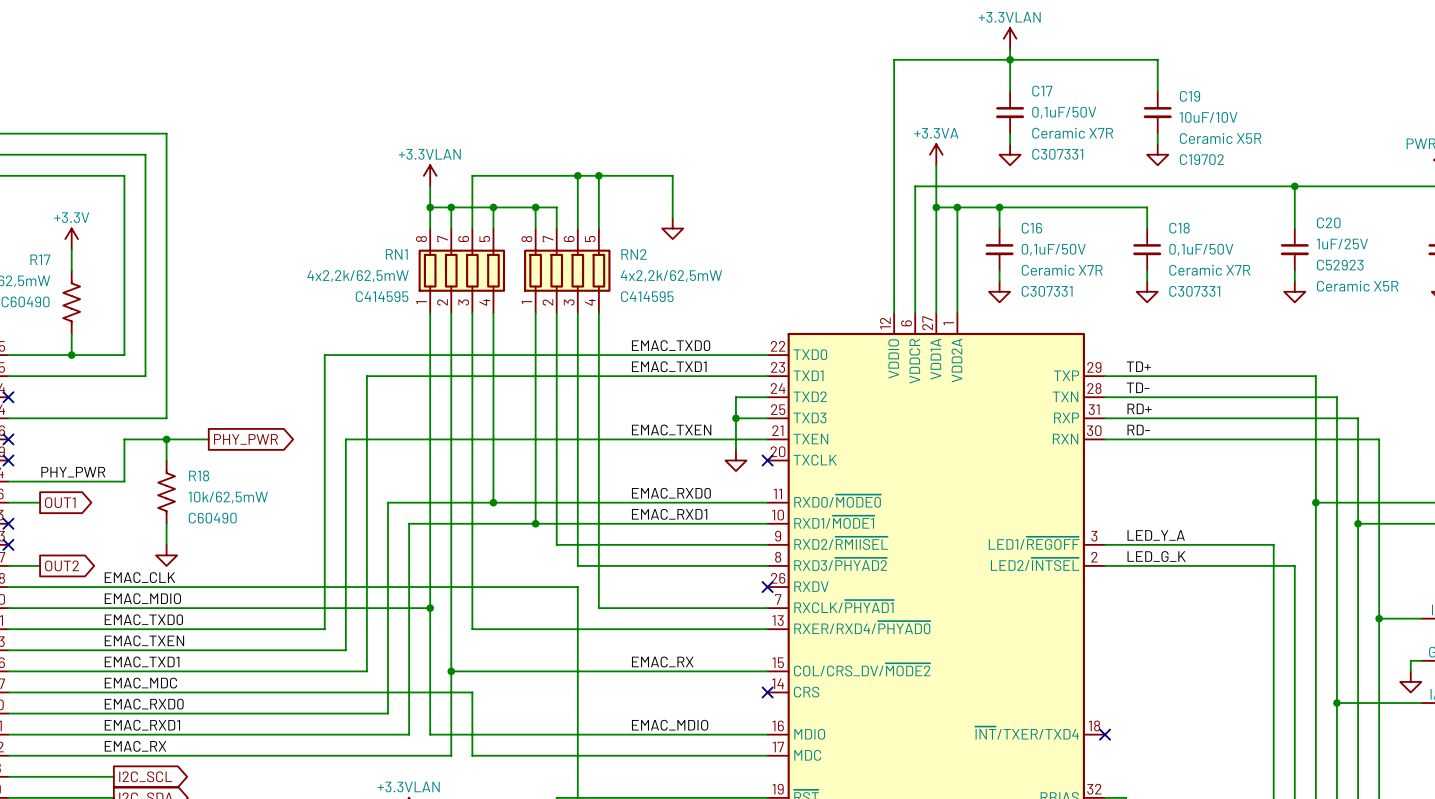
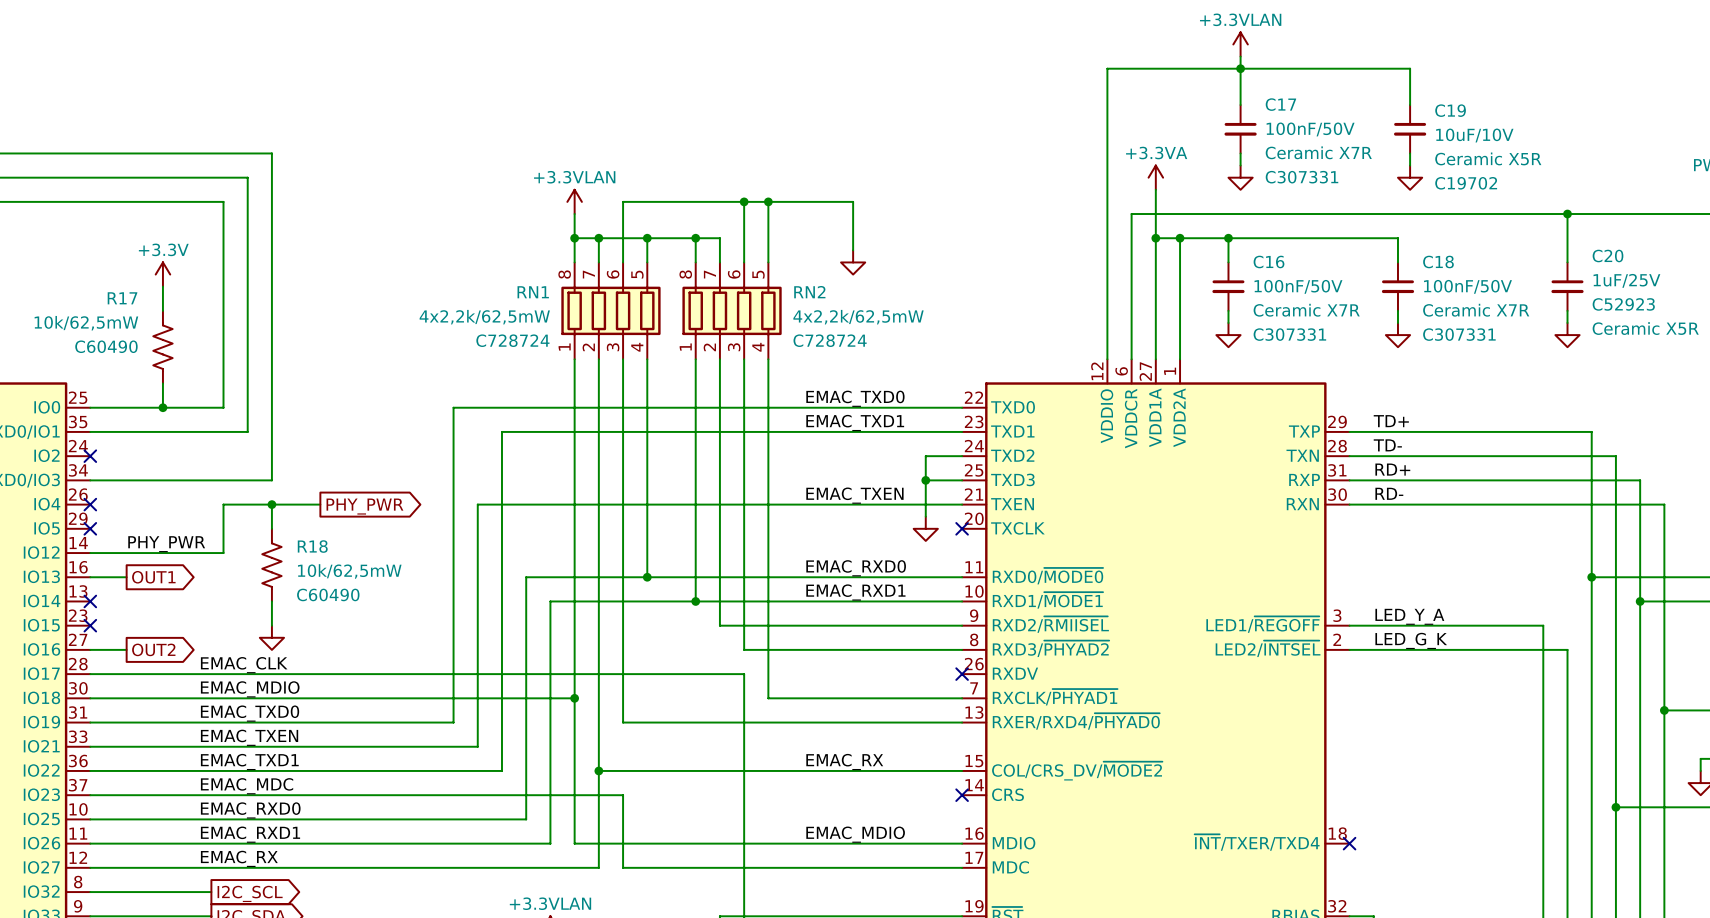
C17 value: 0,1uF/50V (1064, 112) -> 100nF/50V (1310, 129)
C16 value: 0,1uF/50V (1053, 249) -> 100nF/50V (1298, 286)
C18 value: 0,1uF/50V (1201, 249) -> 100nF/50V (1467, 286)
RN1 text: C414595 (382, 296) -> C728724 (512, 340)
RN2 text: C414595 (647, 296) -> C728724 (830, 340)

